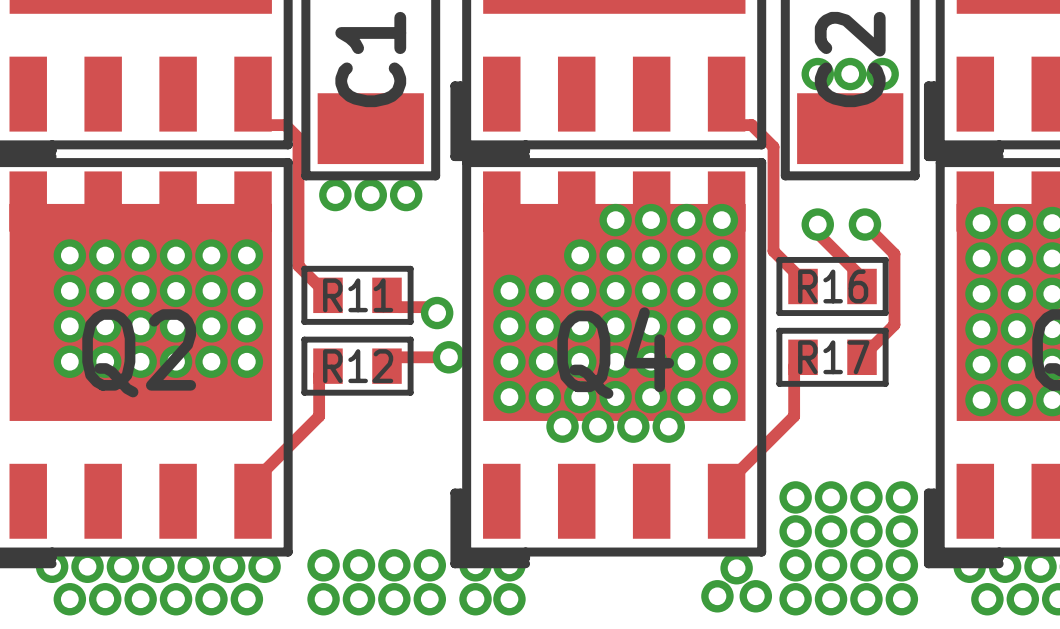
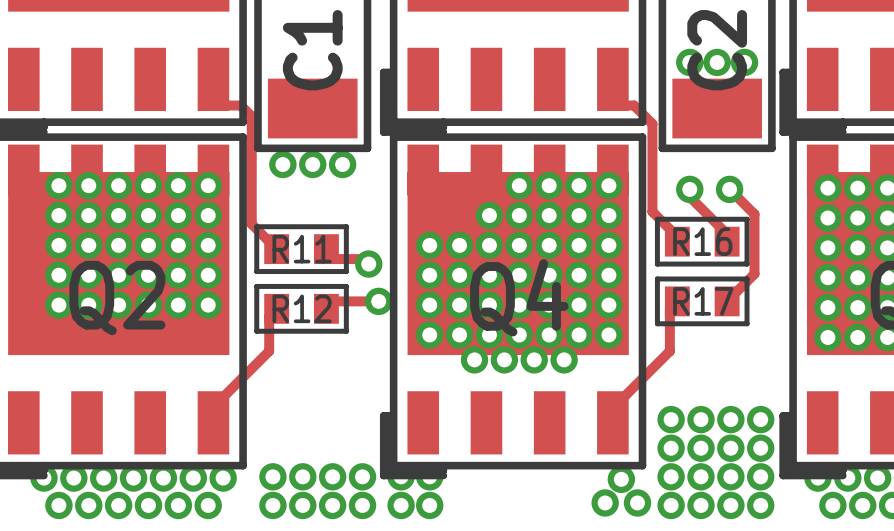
via: none -> (58, 185)
via: none -> (88, 185)
via: none -> (118, 185)
via: none -> (148, 185)
via: none -> (178, 185)
via: none -> (208, 185)

